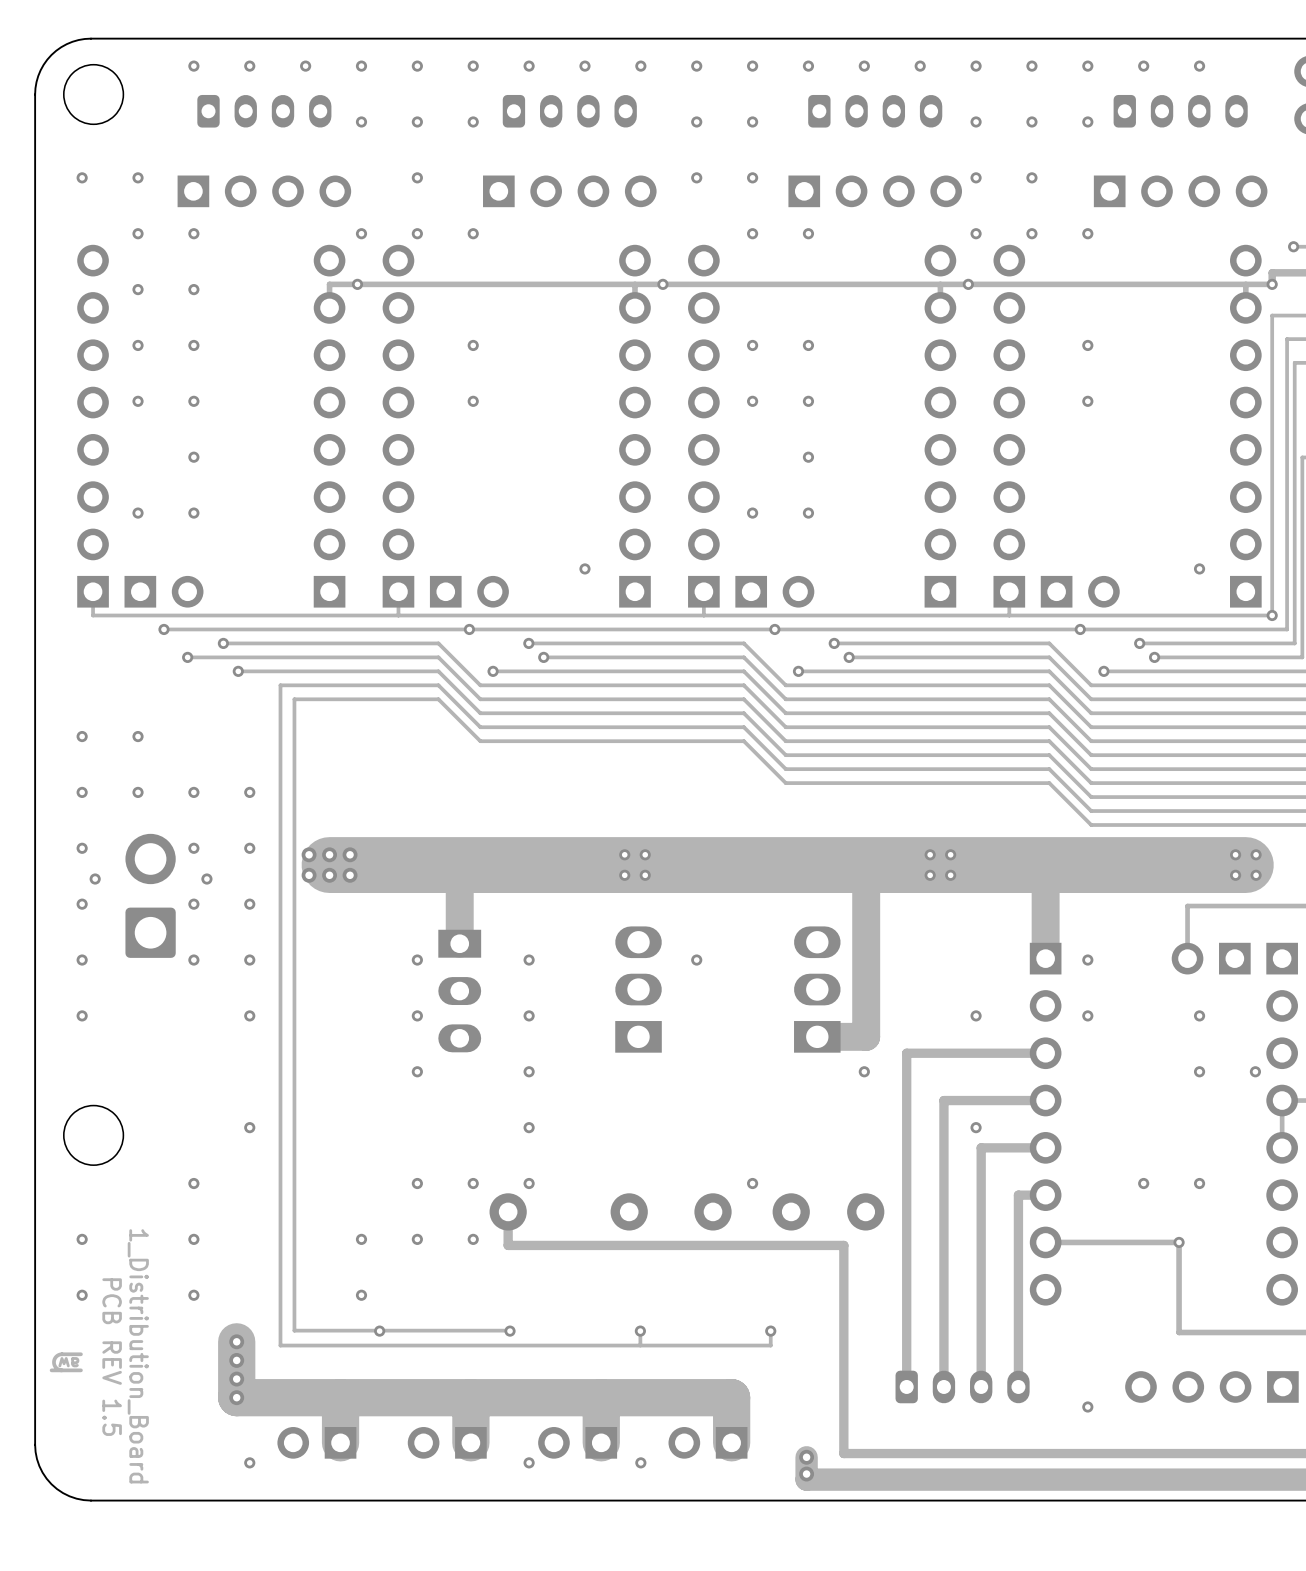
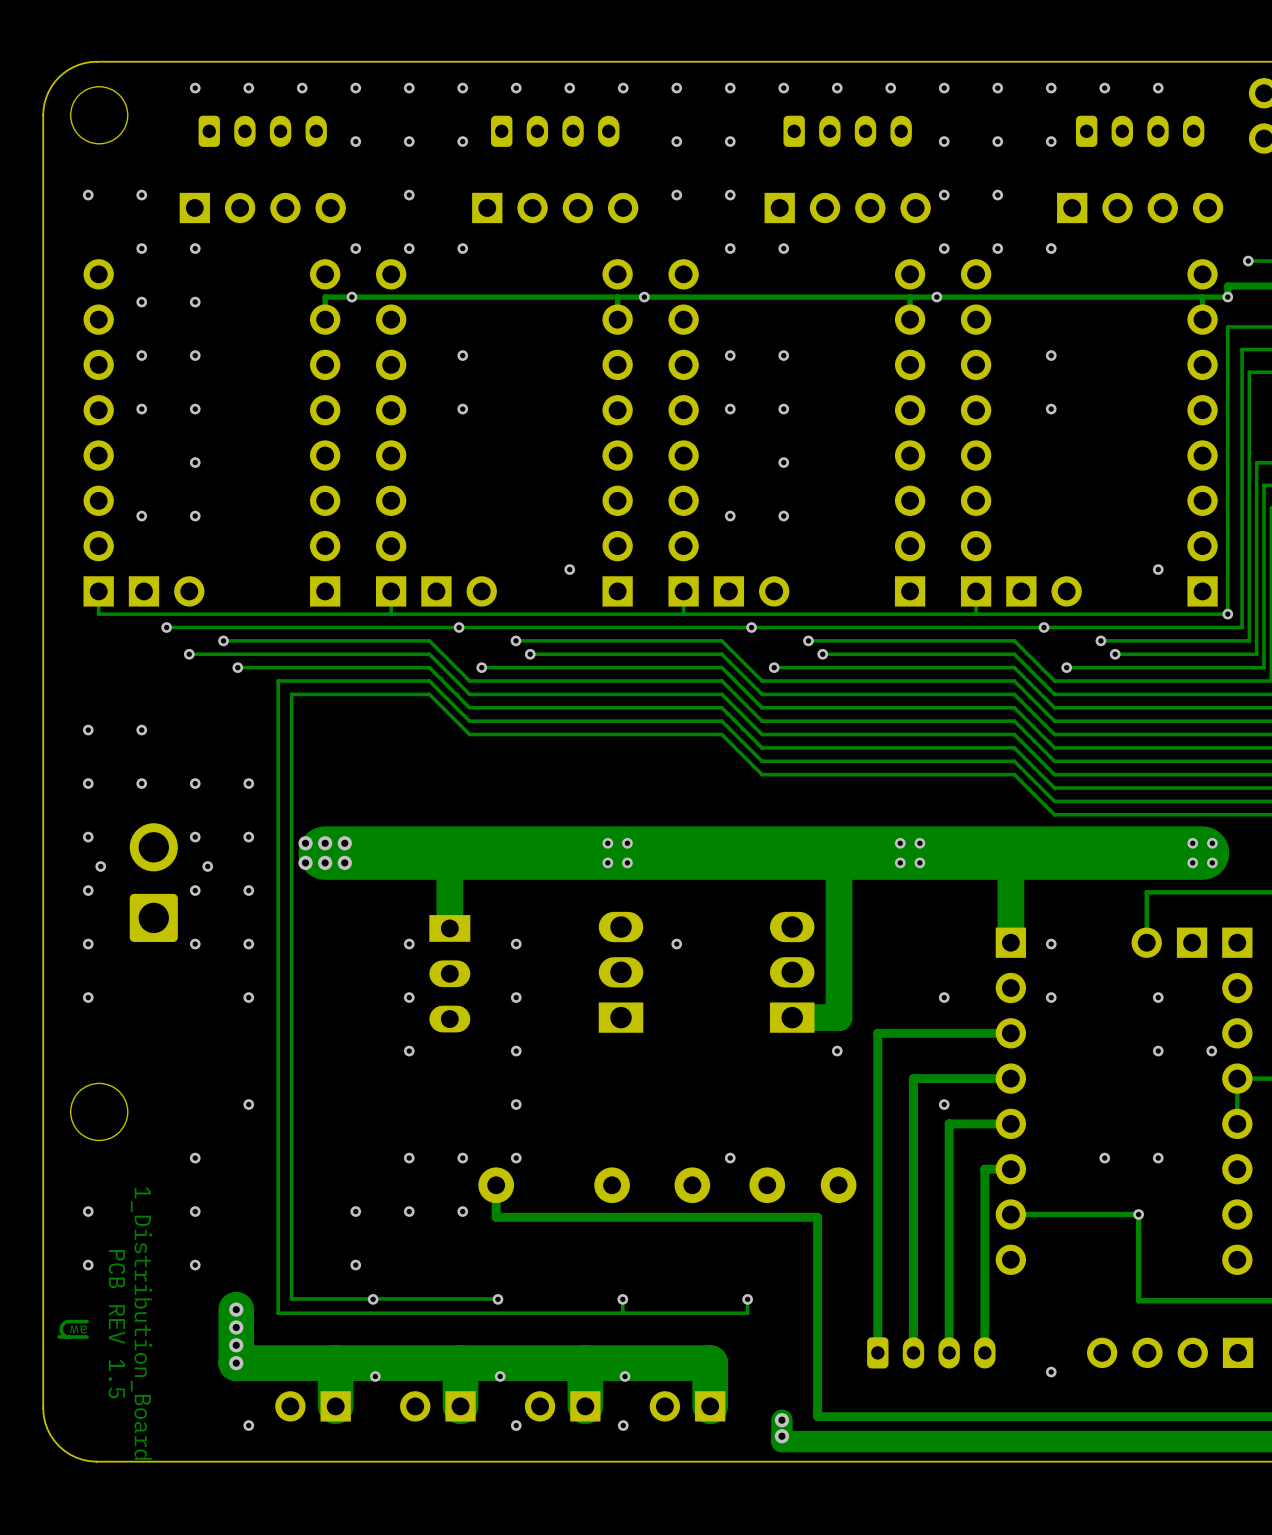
via: none -> (375, 1376)
via: none -> (500, 1376)
via: none -> (625, 1376)

